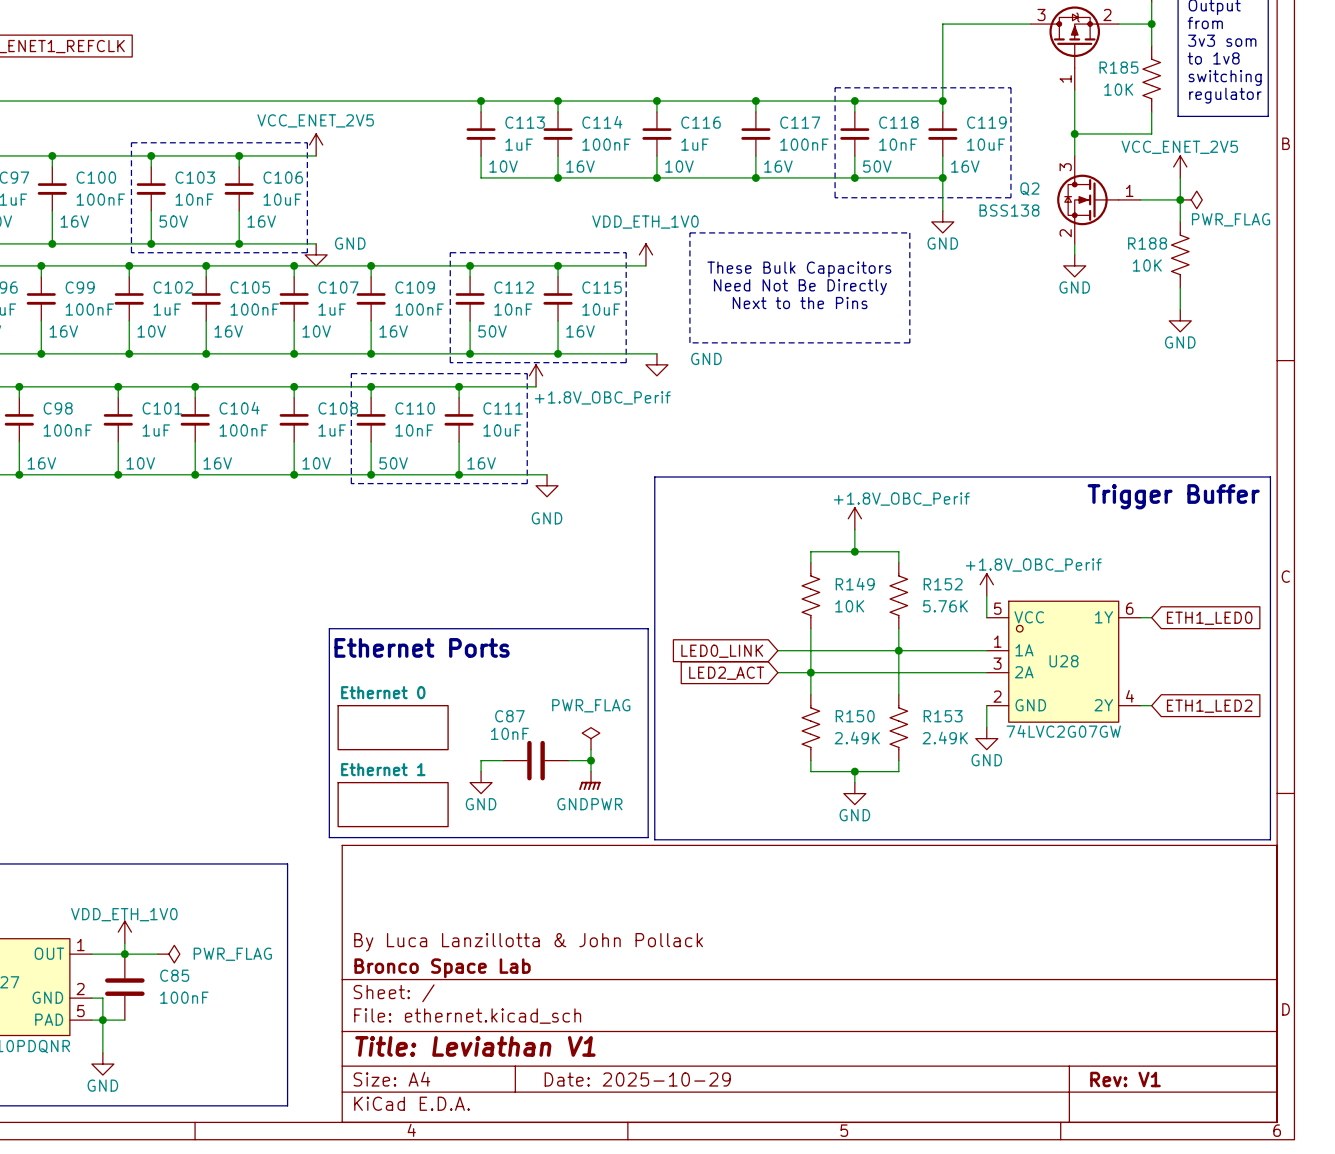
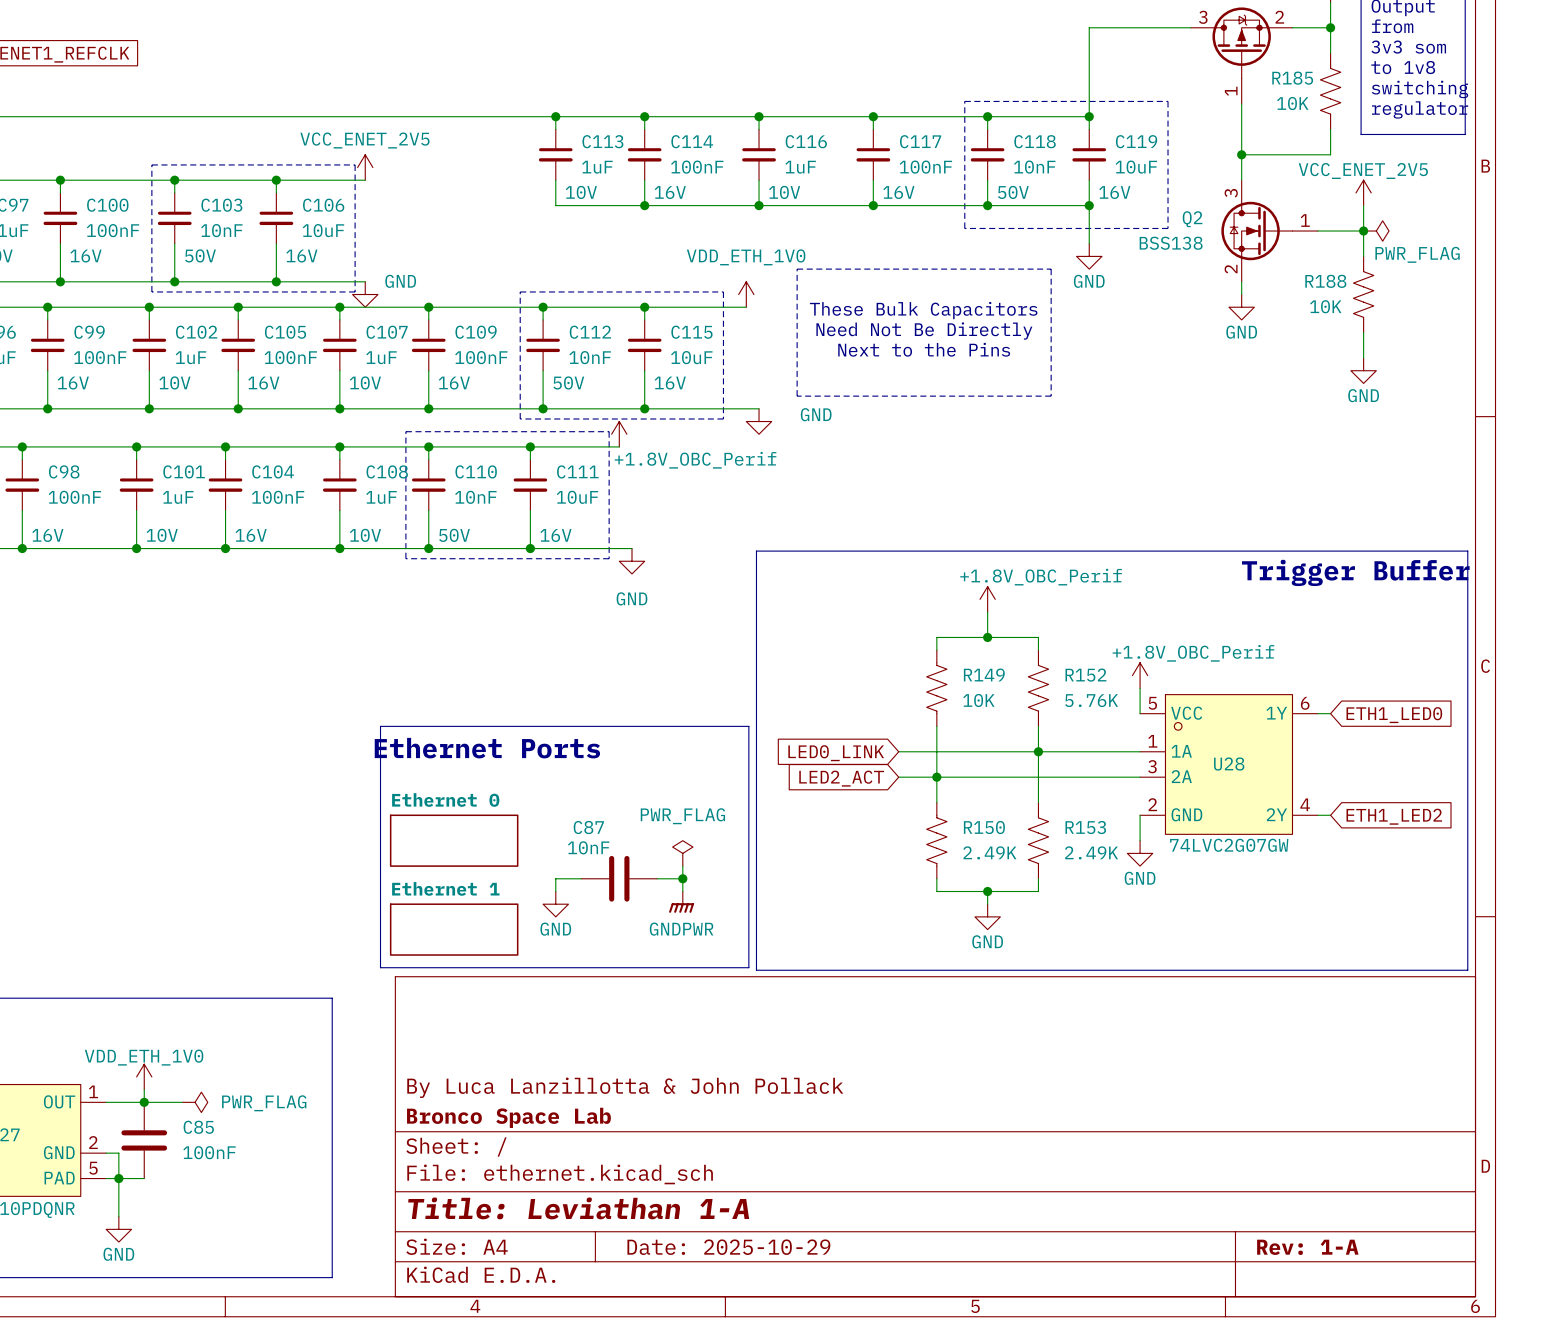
title block: Title: Leviathan V1 (475, 1046) -> Title: Leviathan 1-A (578, 1208)
title block: Rev: V1 (1125, 1079) -> Rev: 1-A (1307, 1247)

